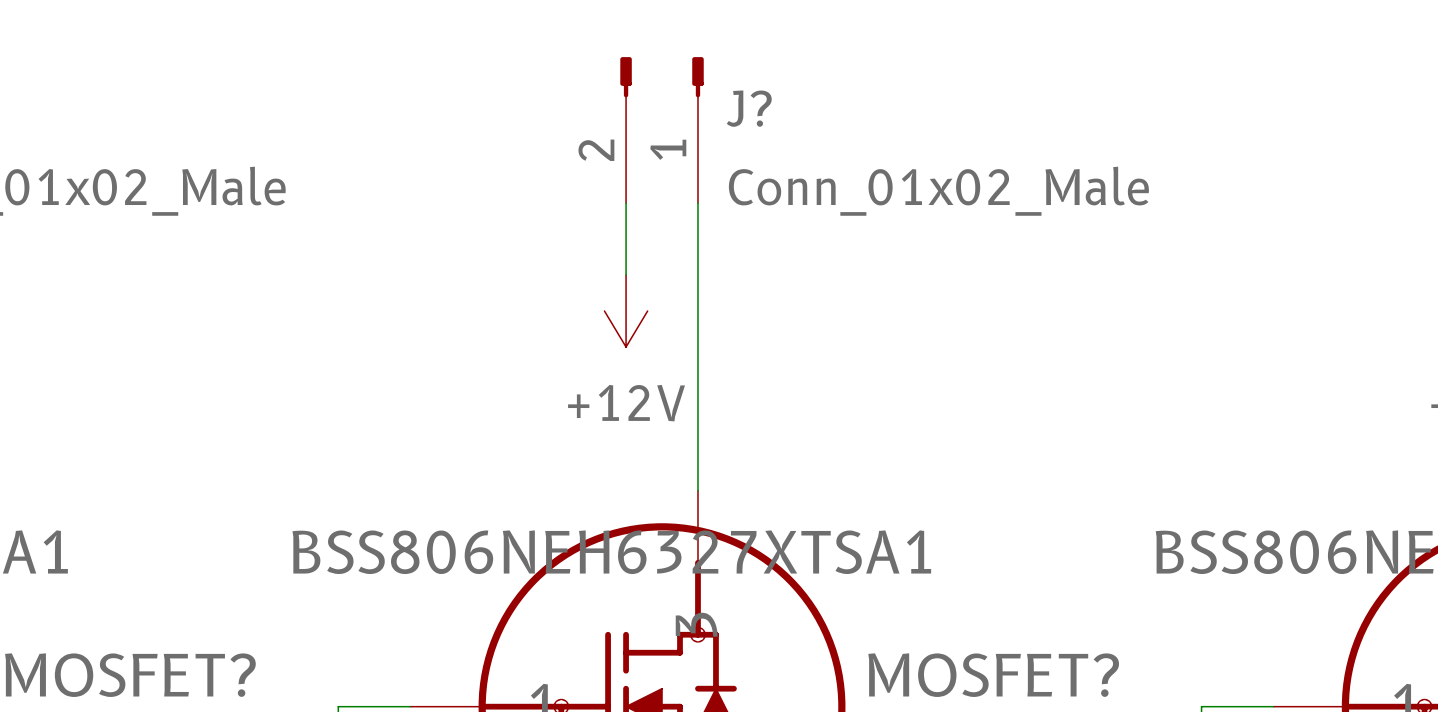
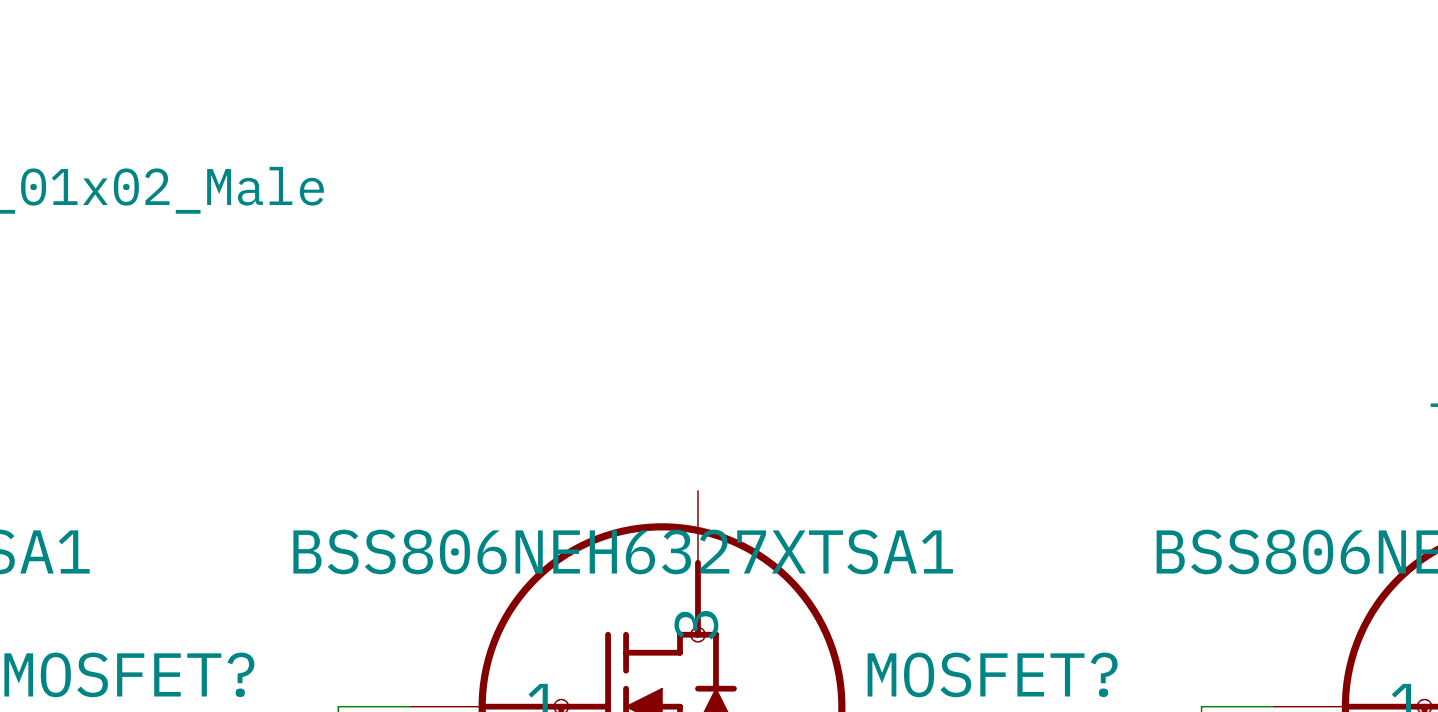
J?: Conn_01x02_Male (662, 130) -> none
wire: (626, 203) (626, 275) -> none
wire: (697, 203) (697, 490) -> none
power symbol: +12V (626, 311) -> none

